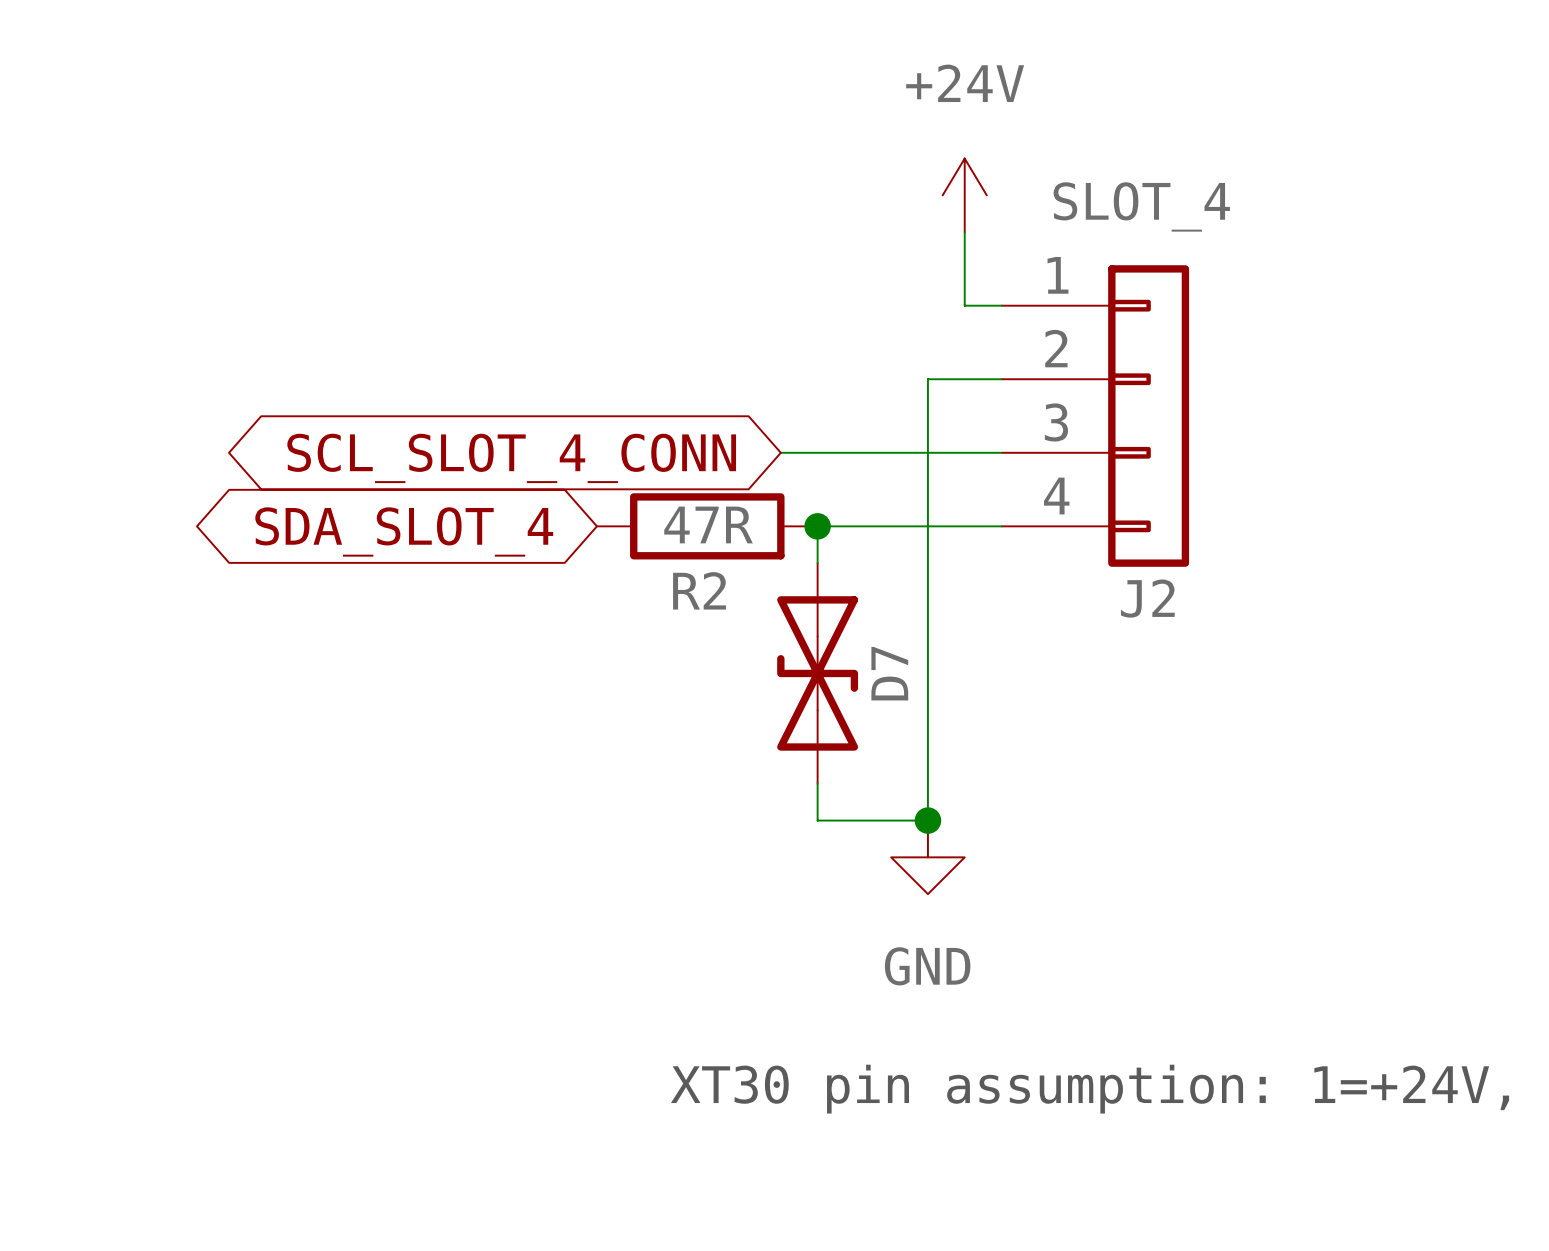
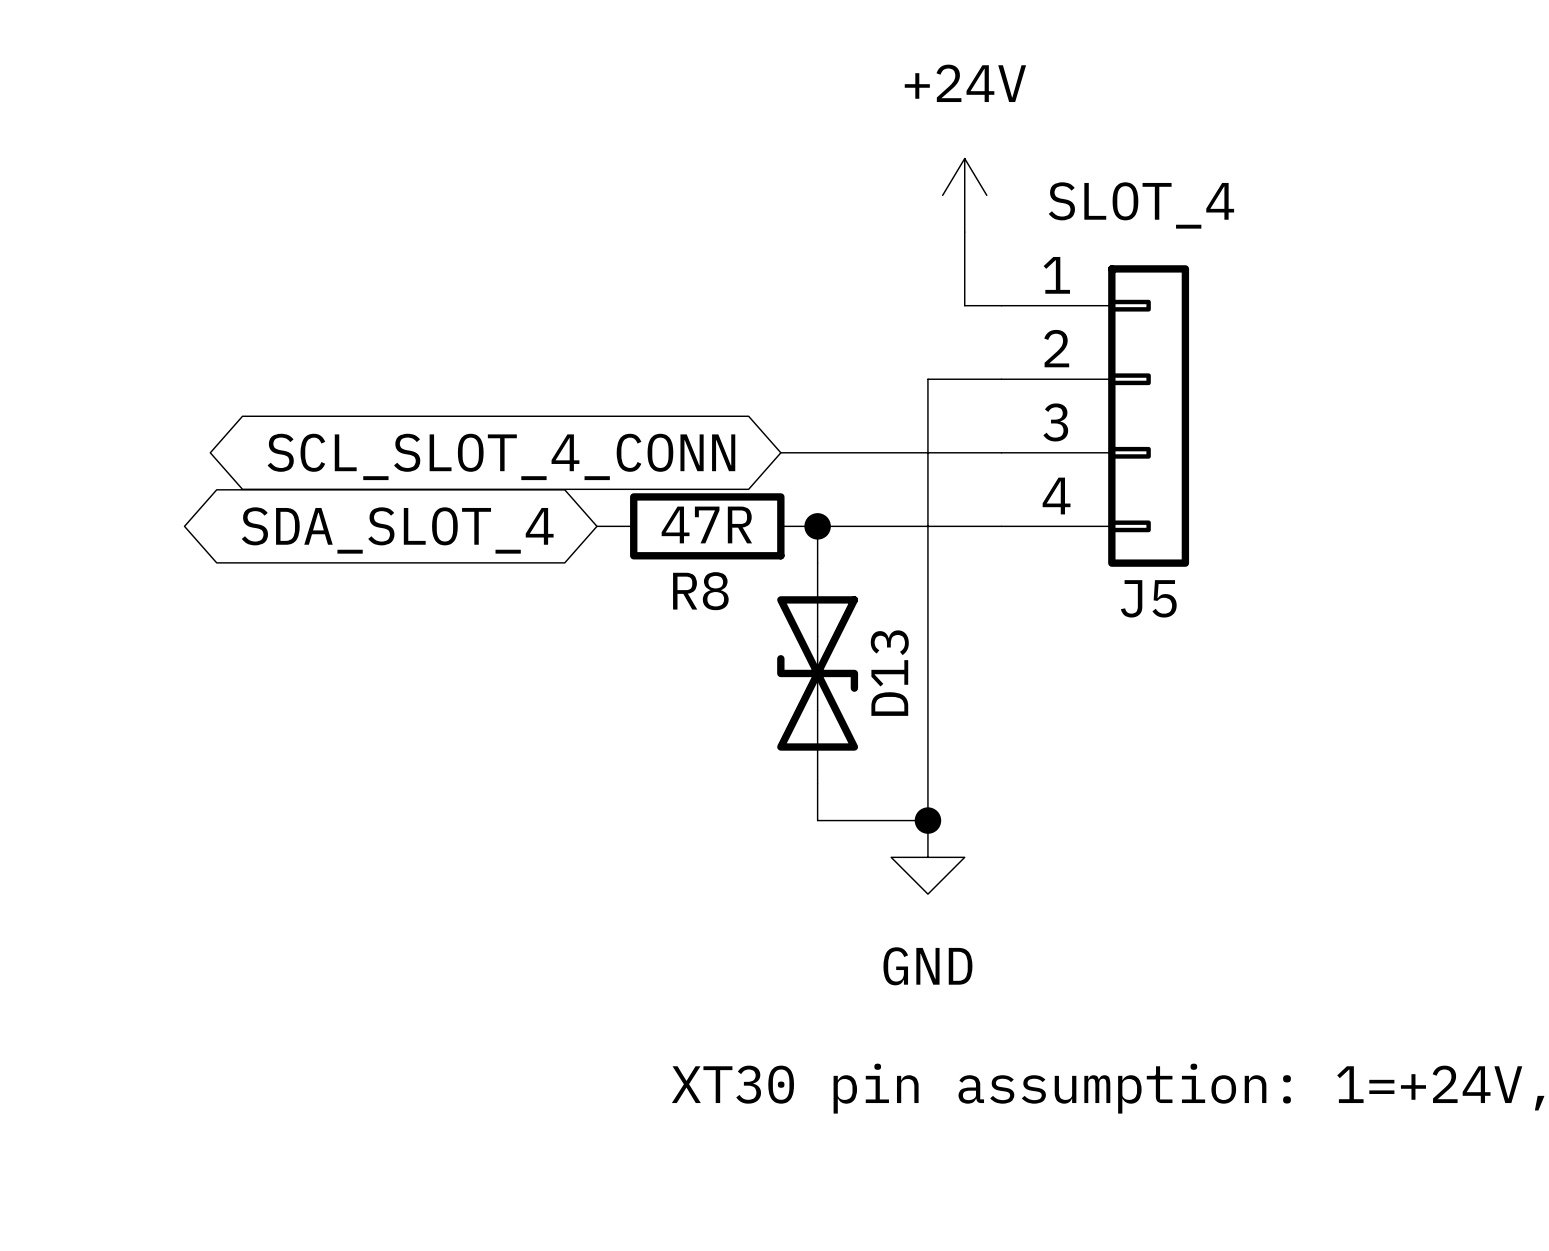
R2 name: R2 (699, 590) -> R8 (700, 591)
J2 name: J2 (1147, 598) -> J5 (1148, 598)
D7 name: D7 (889, 673) -> D13 (889, 673)

